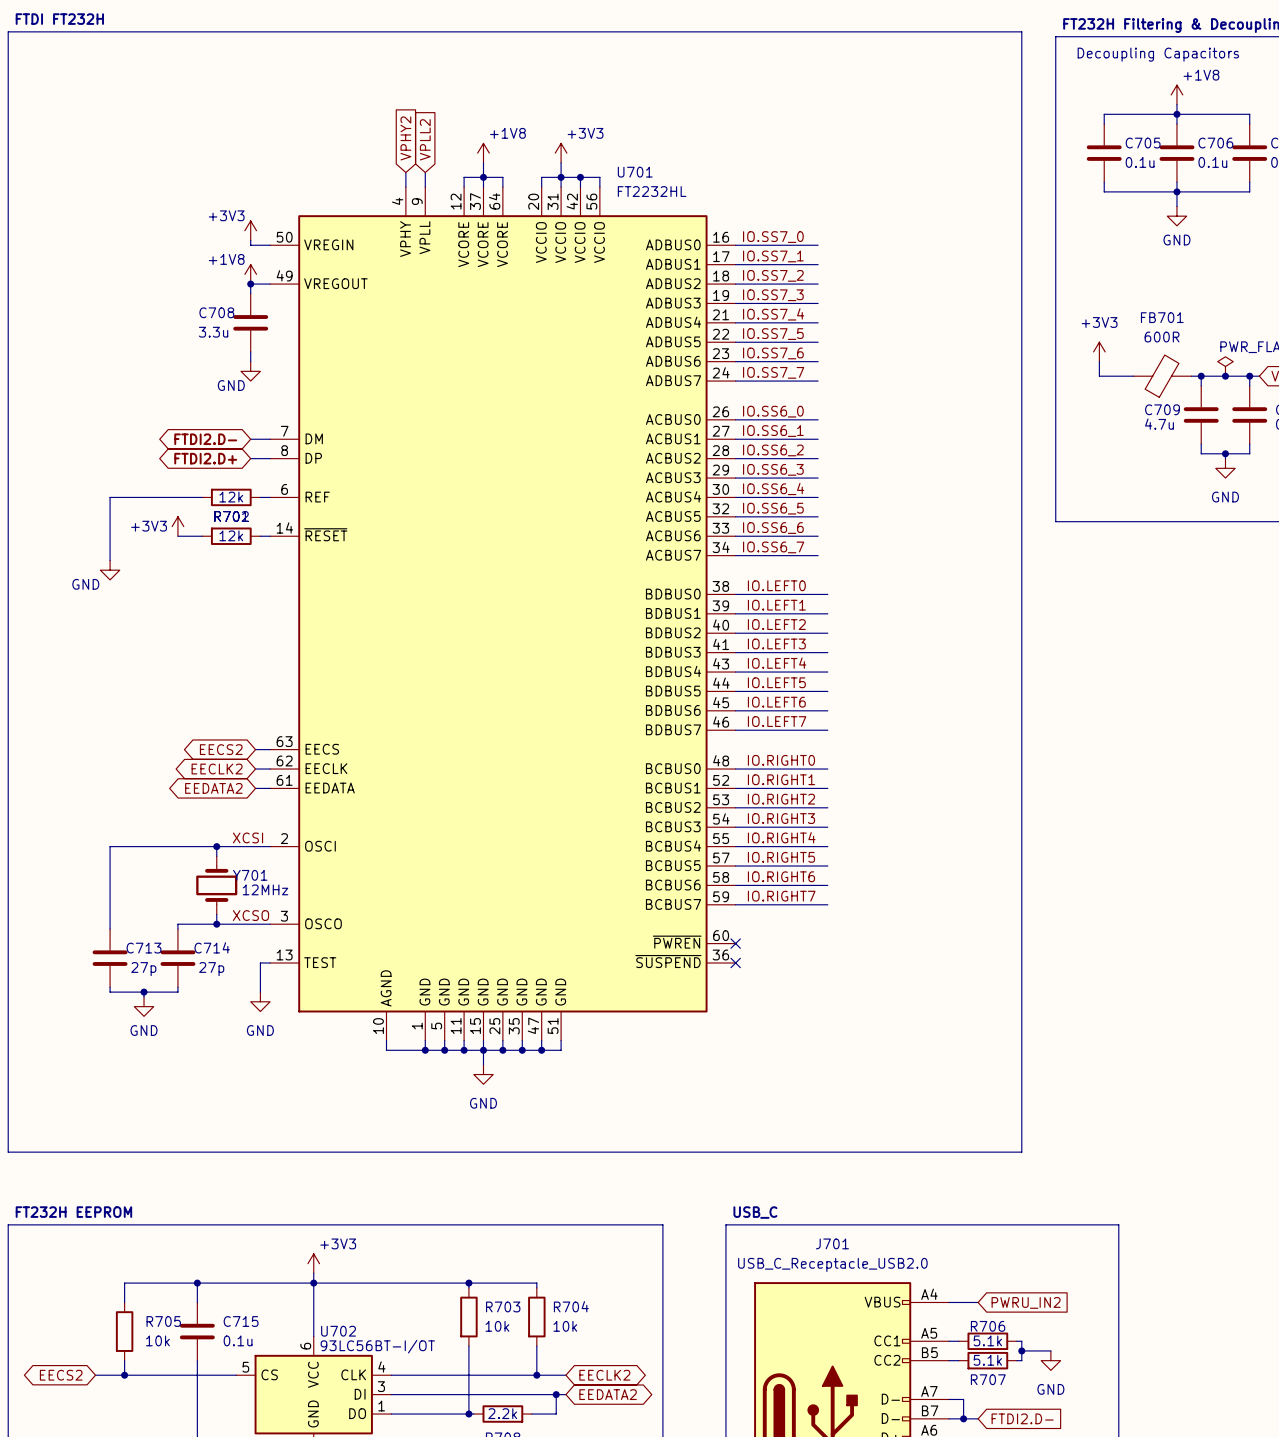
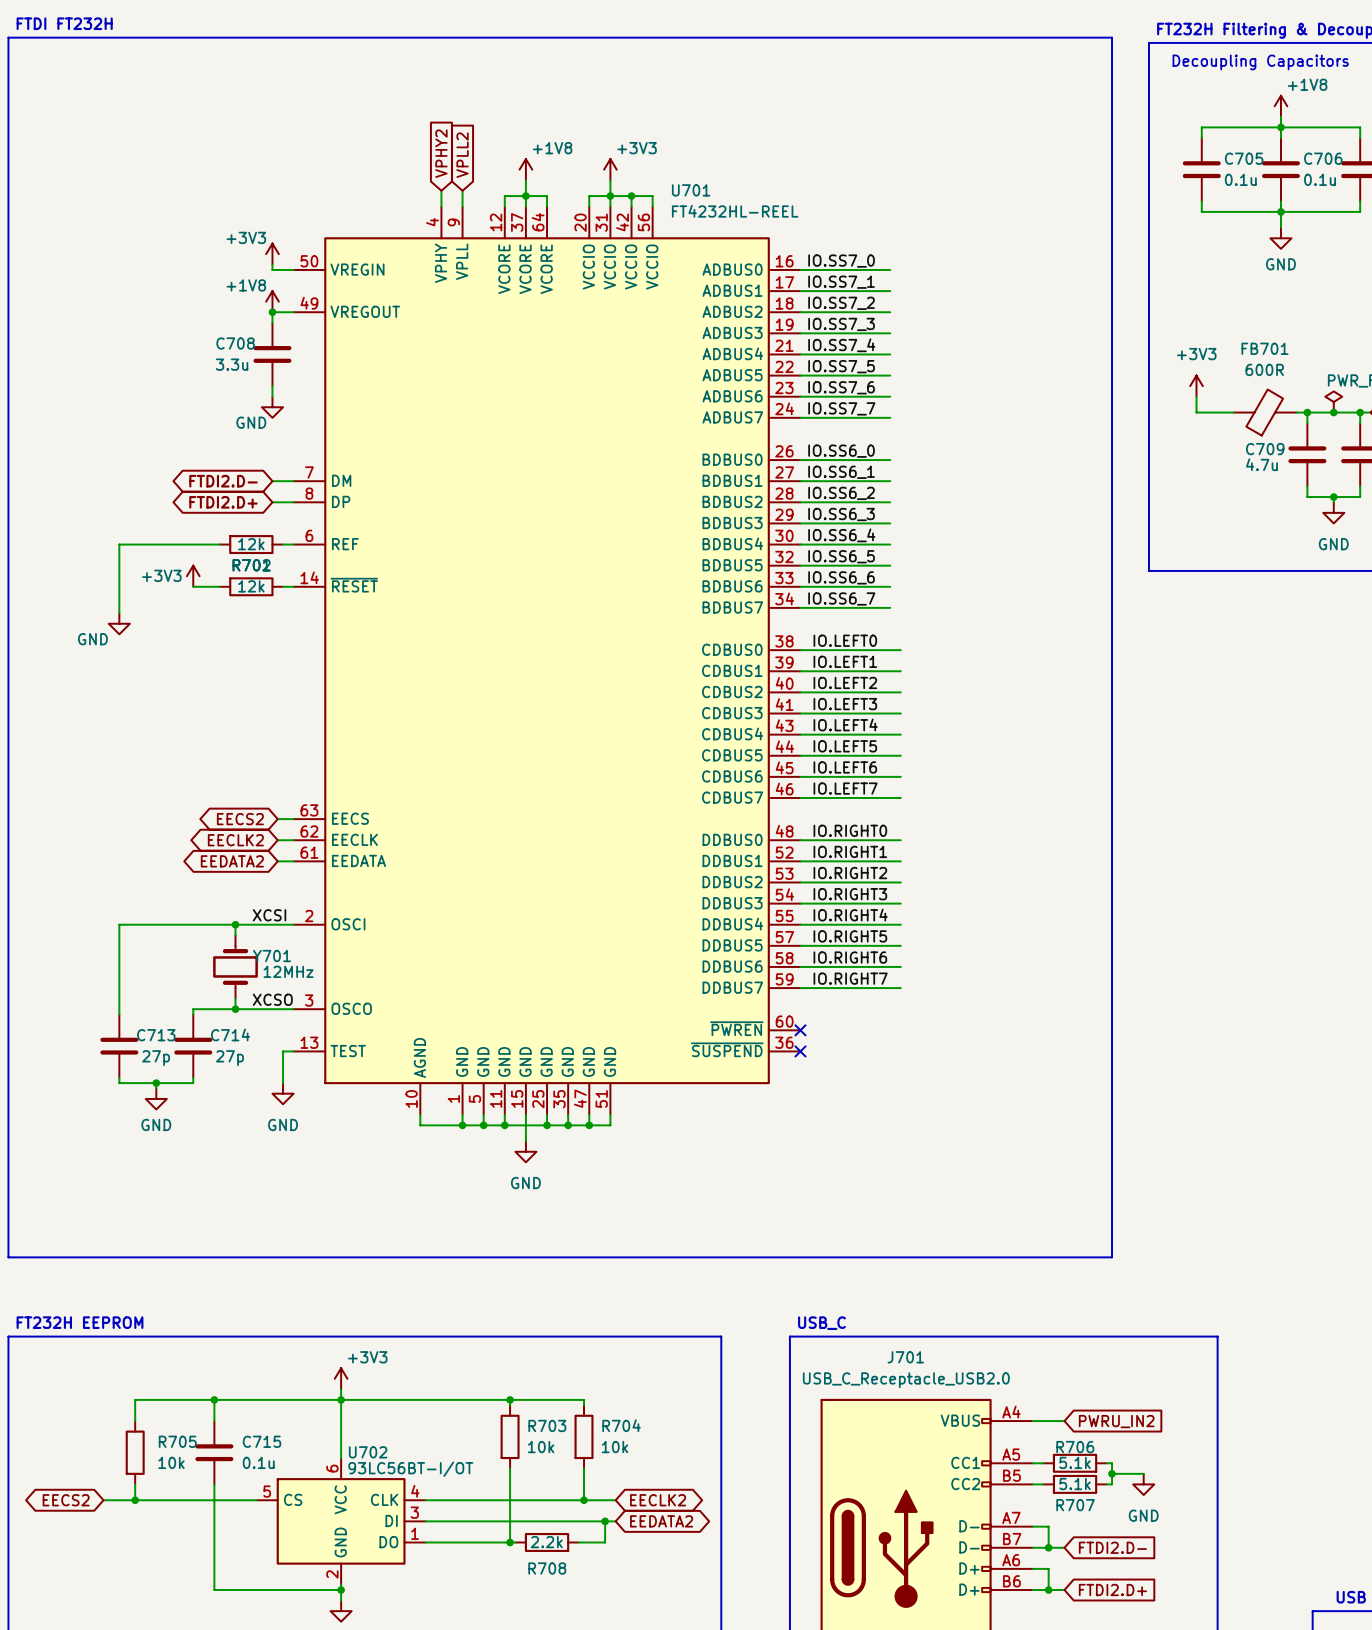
U701 symbol: [270, 187, 736, 1041] -> [293, 206, 801, 1115]
U701 value: FT2232HL (652, 191) -> FT4232HL-REEL (735, 211)
junction: none -> (462, 1125)
junction: none -> (483, 1125)
junction: none -> (504, 1125)
junction: none -> (547, 1125)
junction: none -> (568, 1125)
junction: none -> (589, 1125)
wire: (386, 1040) (386, 1050) (561, 1050) (561, 1040) -> (420, 1114) (420, 1125) (610, 1125) (610, 1114)
junction: (425, 1050) -> none
junction: (444, 1050) -> none
junction: (464, 1050) -> none
junction: (483, 1050) -> none
junction: (502, 1050) -> none
junction: (522, 1050) -> none
junction: (541, 1050) -> none
power symbol position: GND (483, 1074) -> GND (525, 1151)

